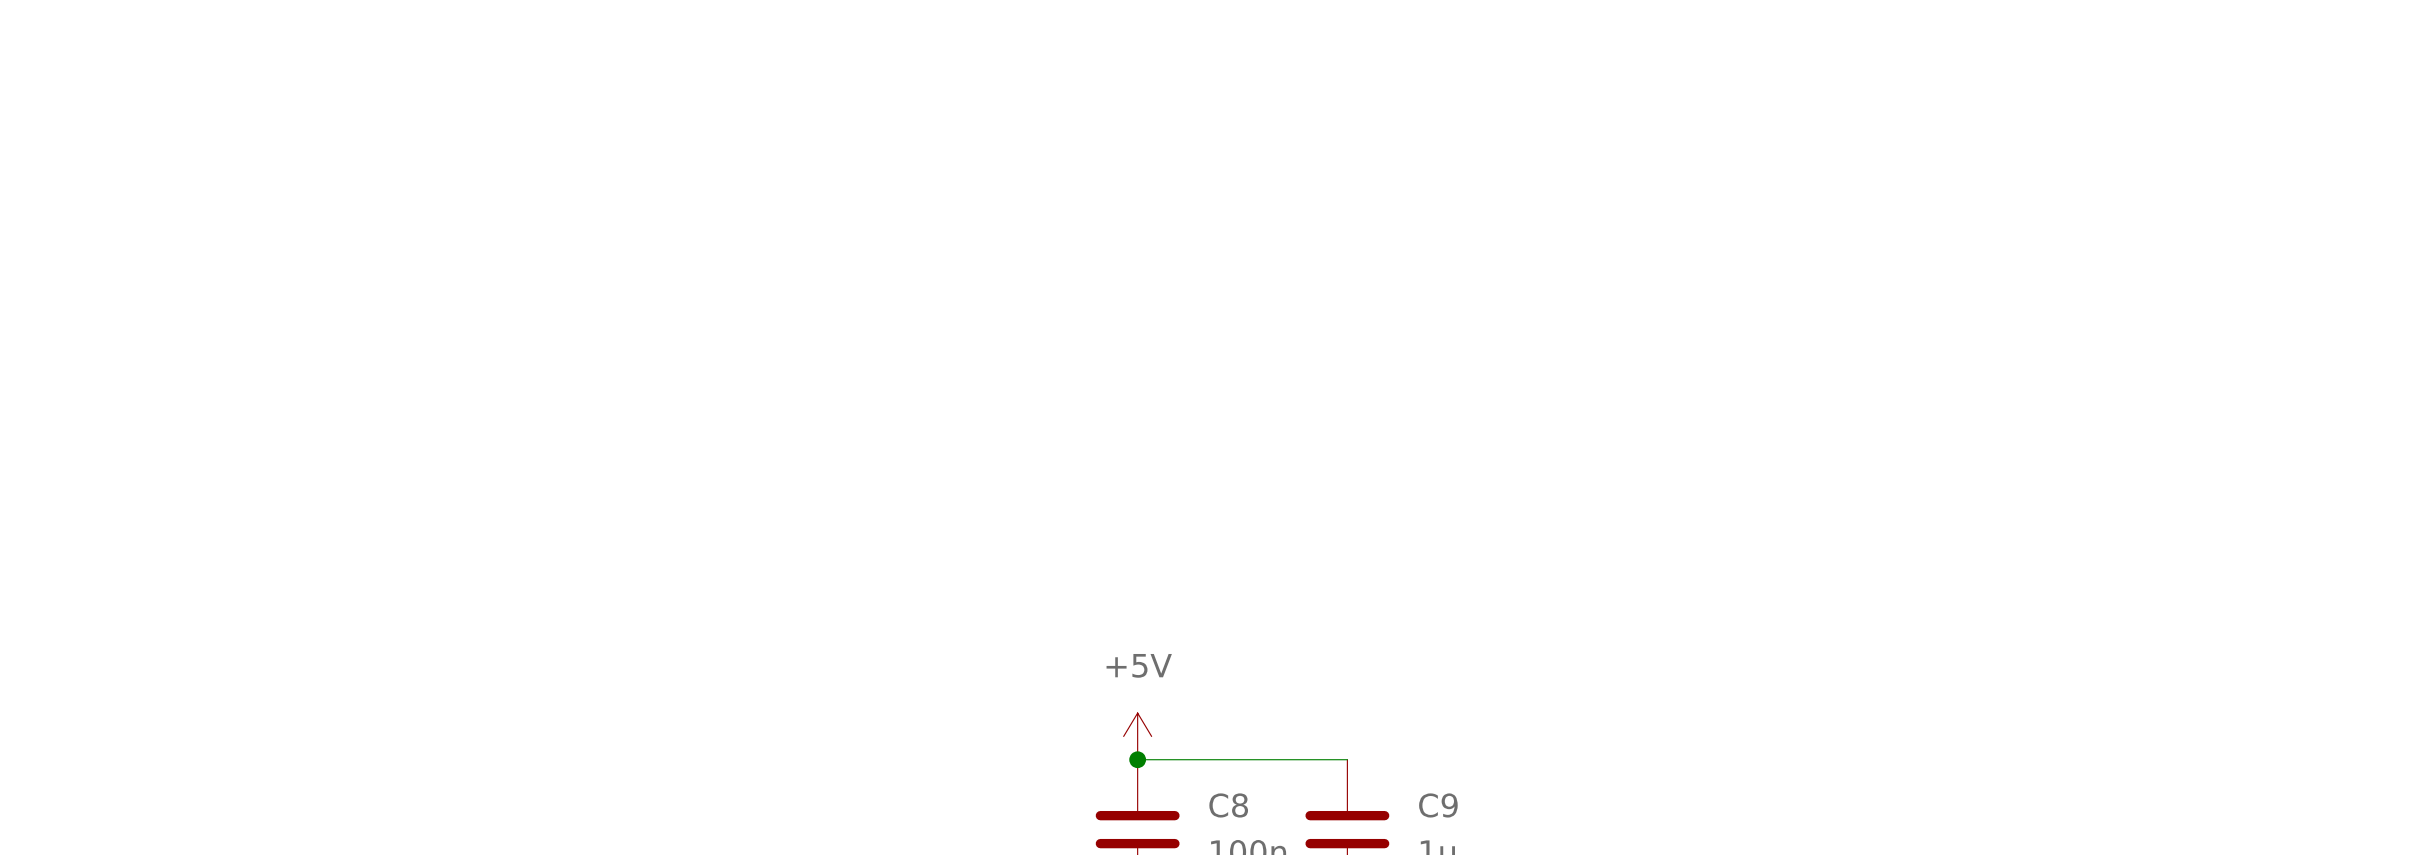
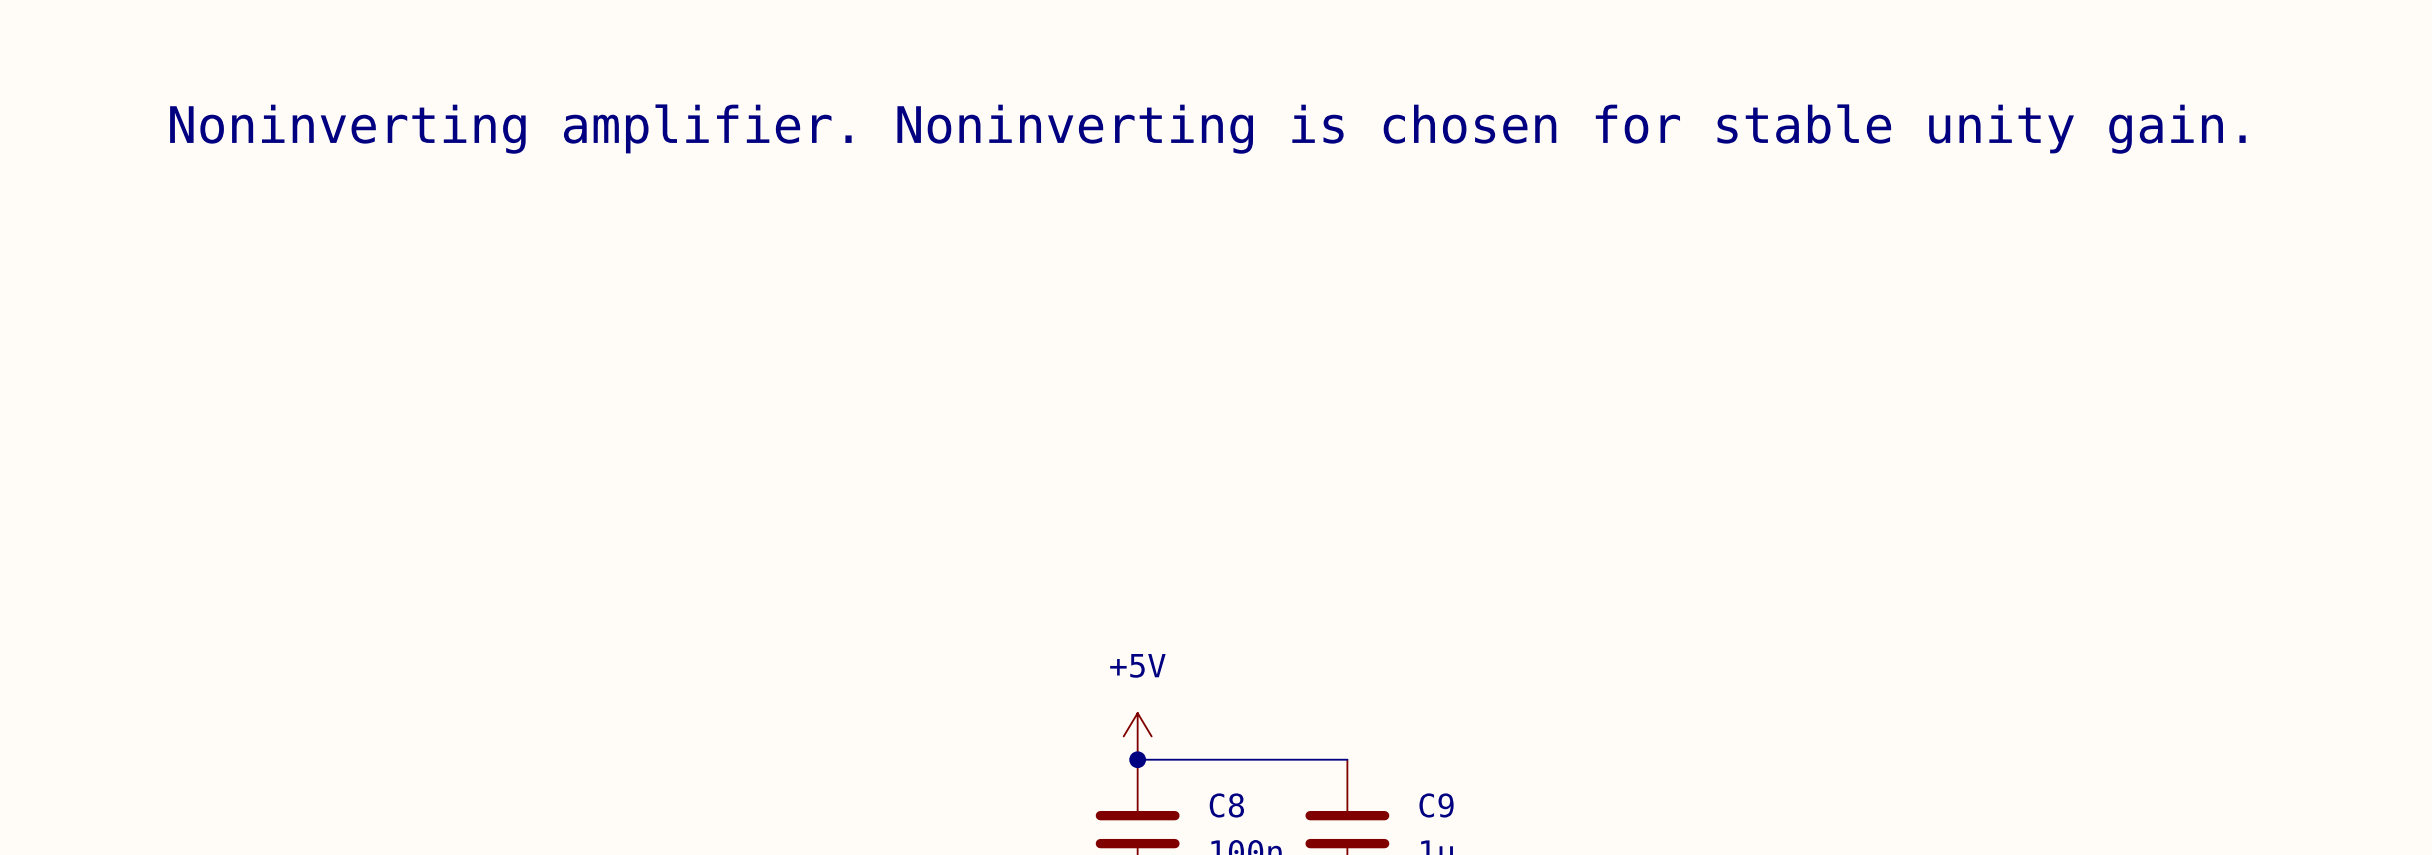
text: none -> Noninverting amplifier. Noninverting is chosen for stable unity gain. (1207, 129)

